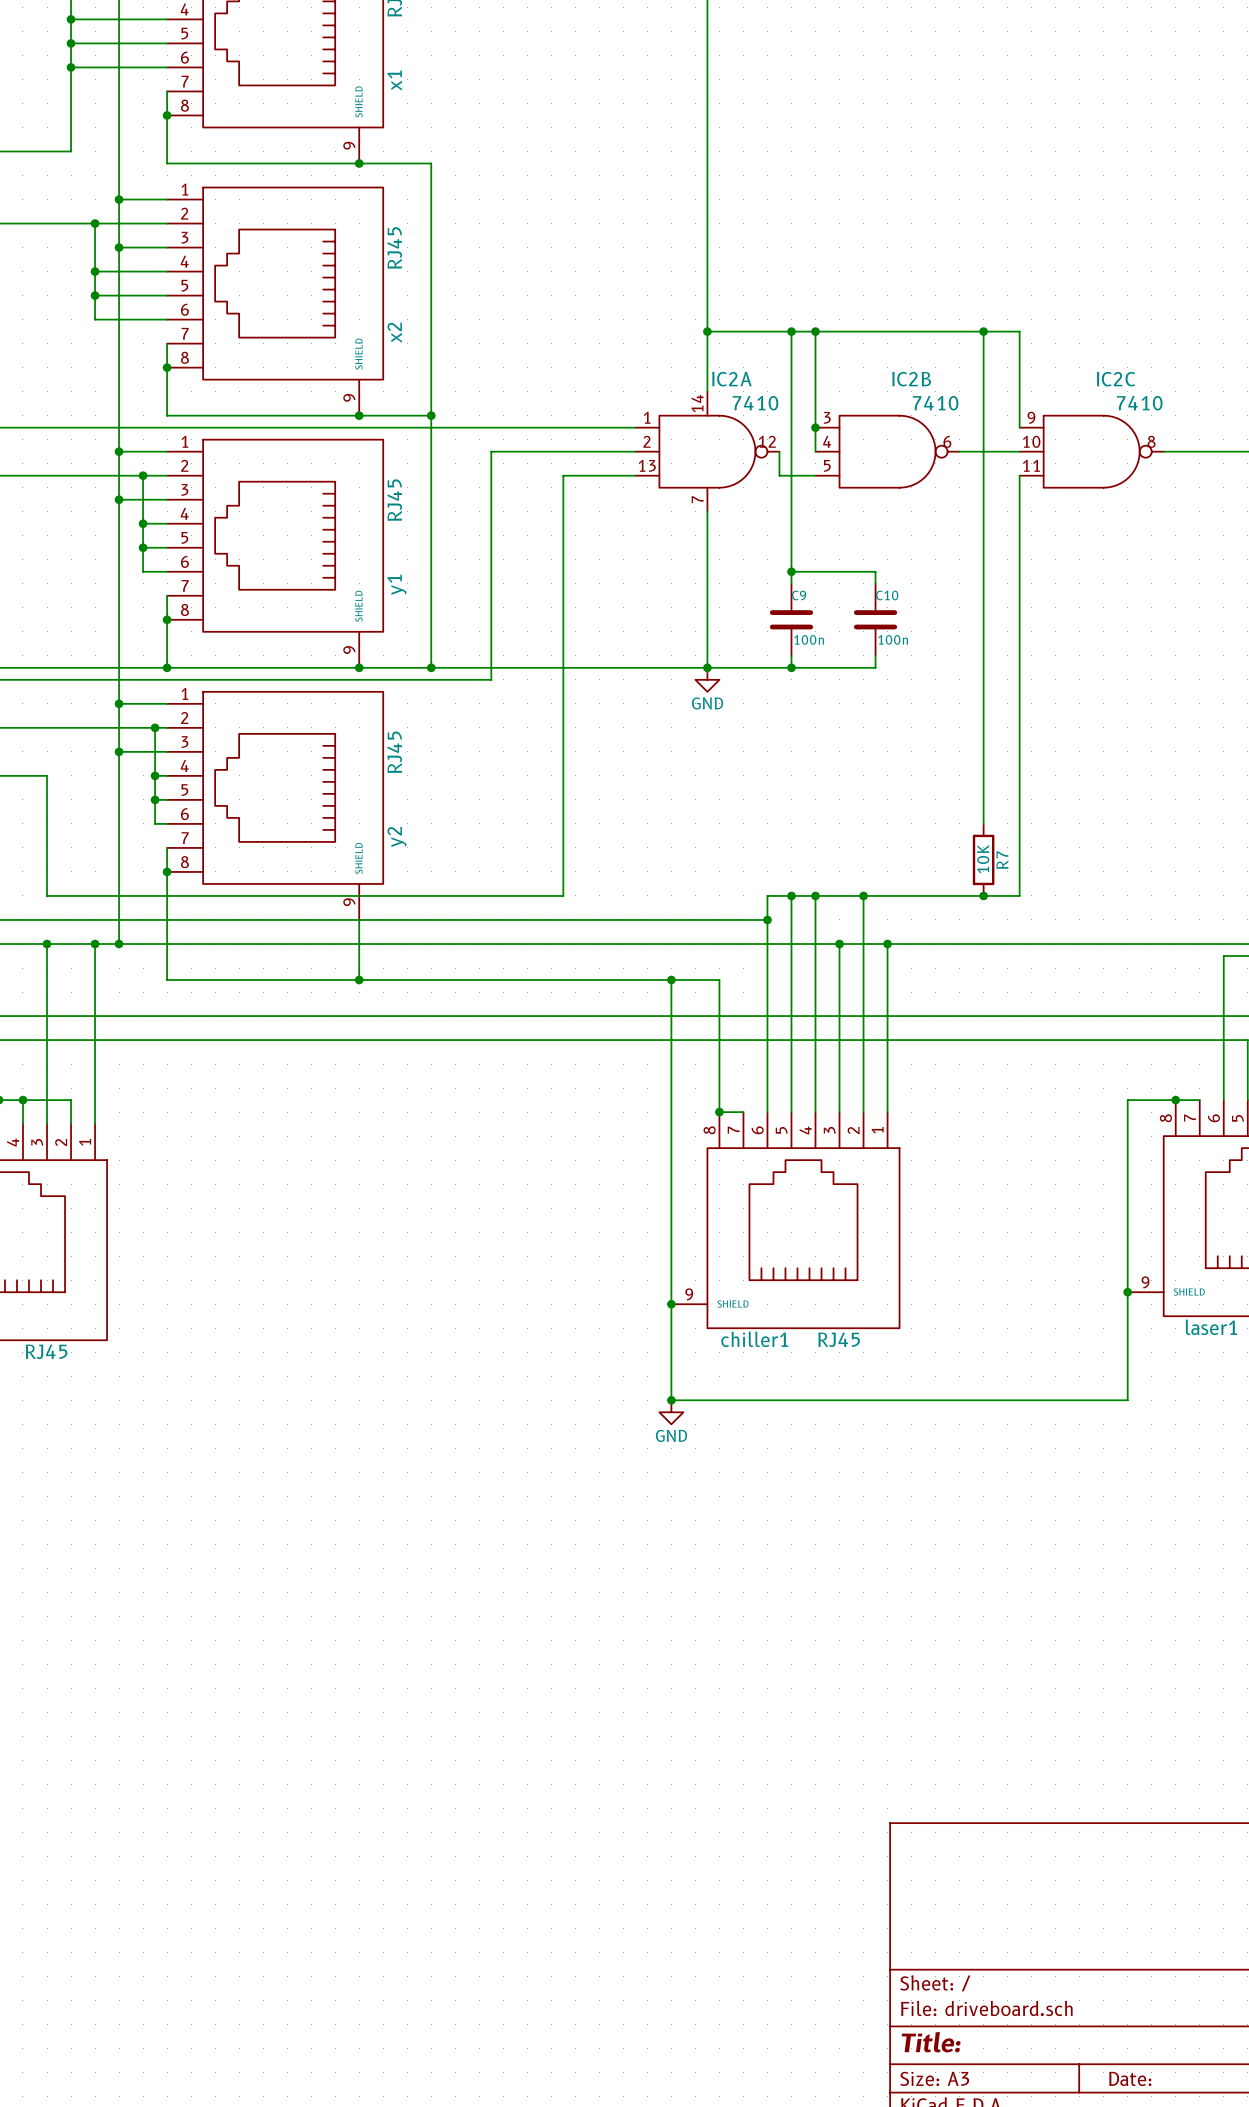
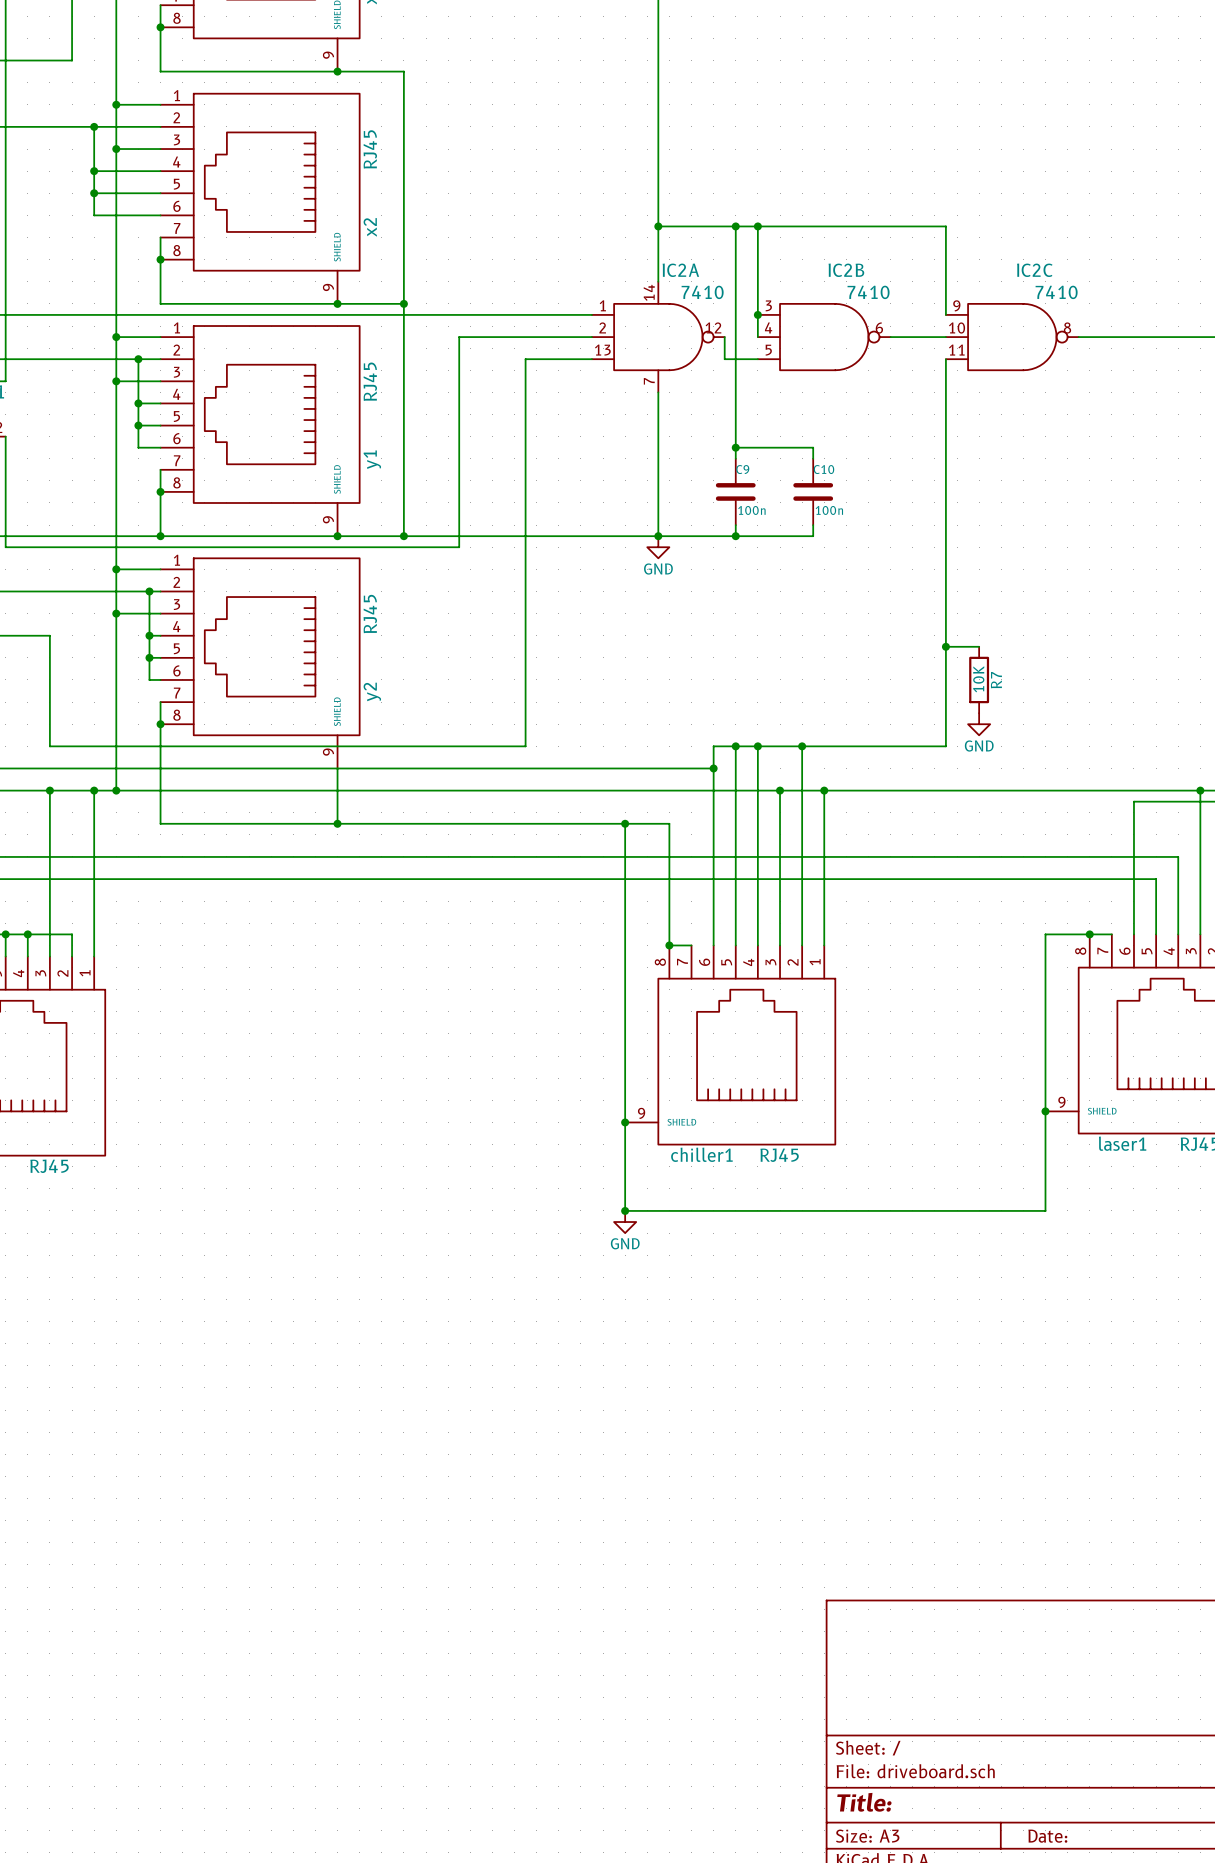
wire: (983, 331) (983, 823) -> none
junction: (983, 331) -> none
wire: none -> (945, 646) (979, 646)
junction: none -> (945, 646)
R7 position: (983, 859) -> (979, 679)
power symbol: none -> GND (979, 724)
junction: (983, 895) -> none

